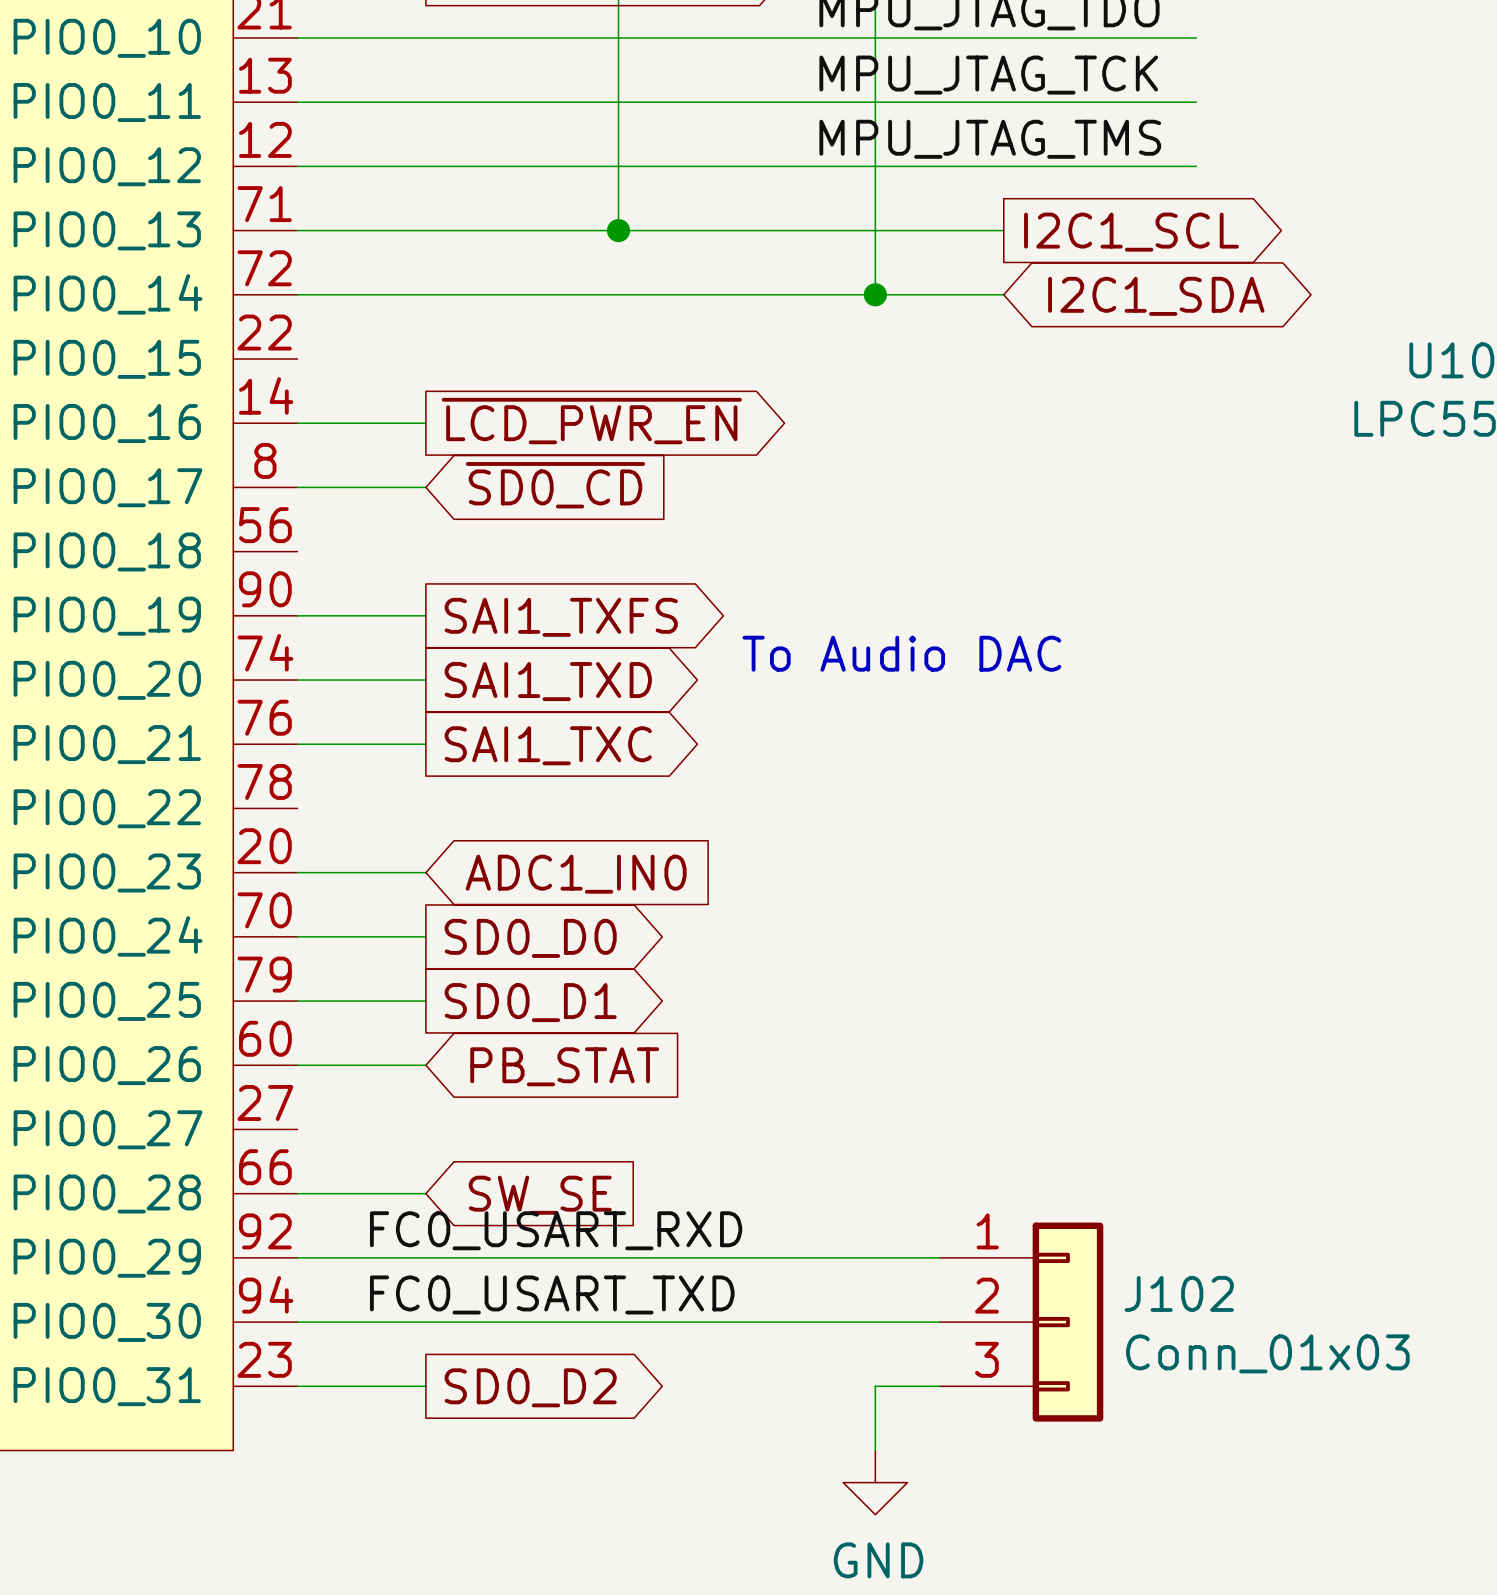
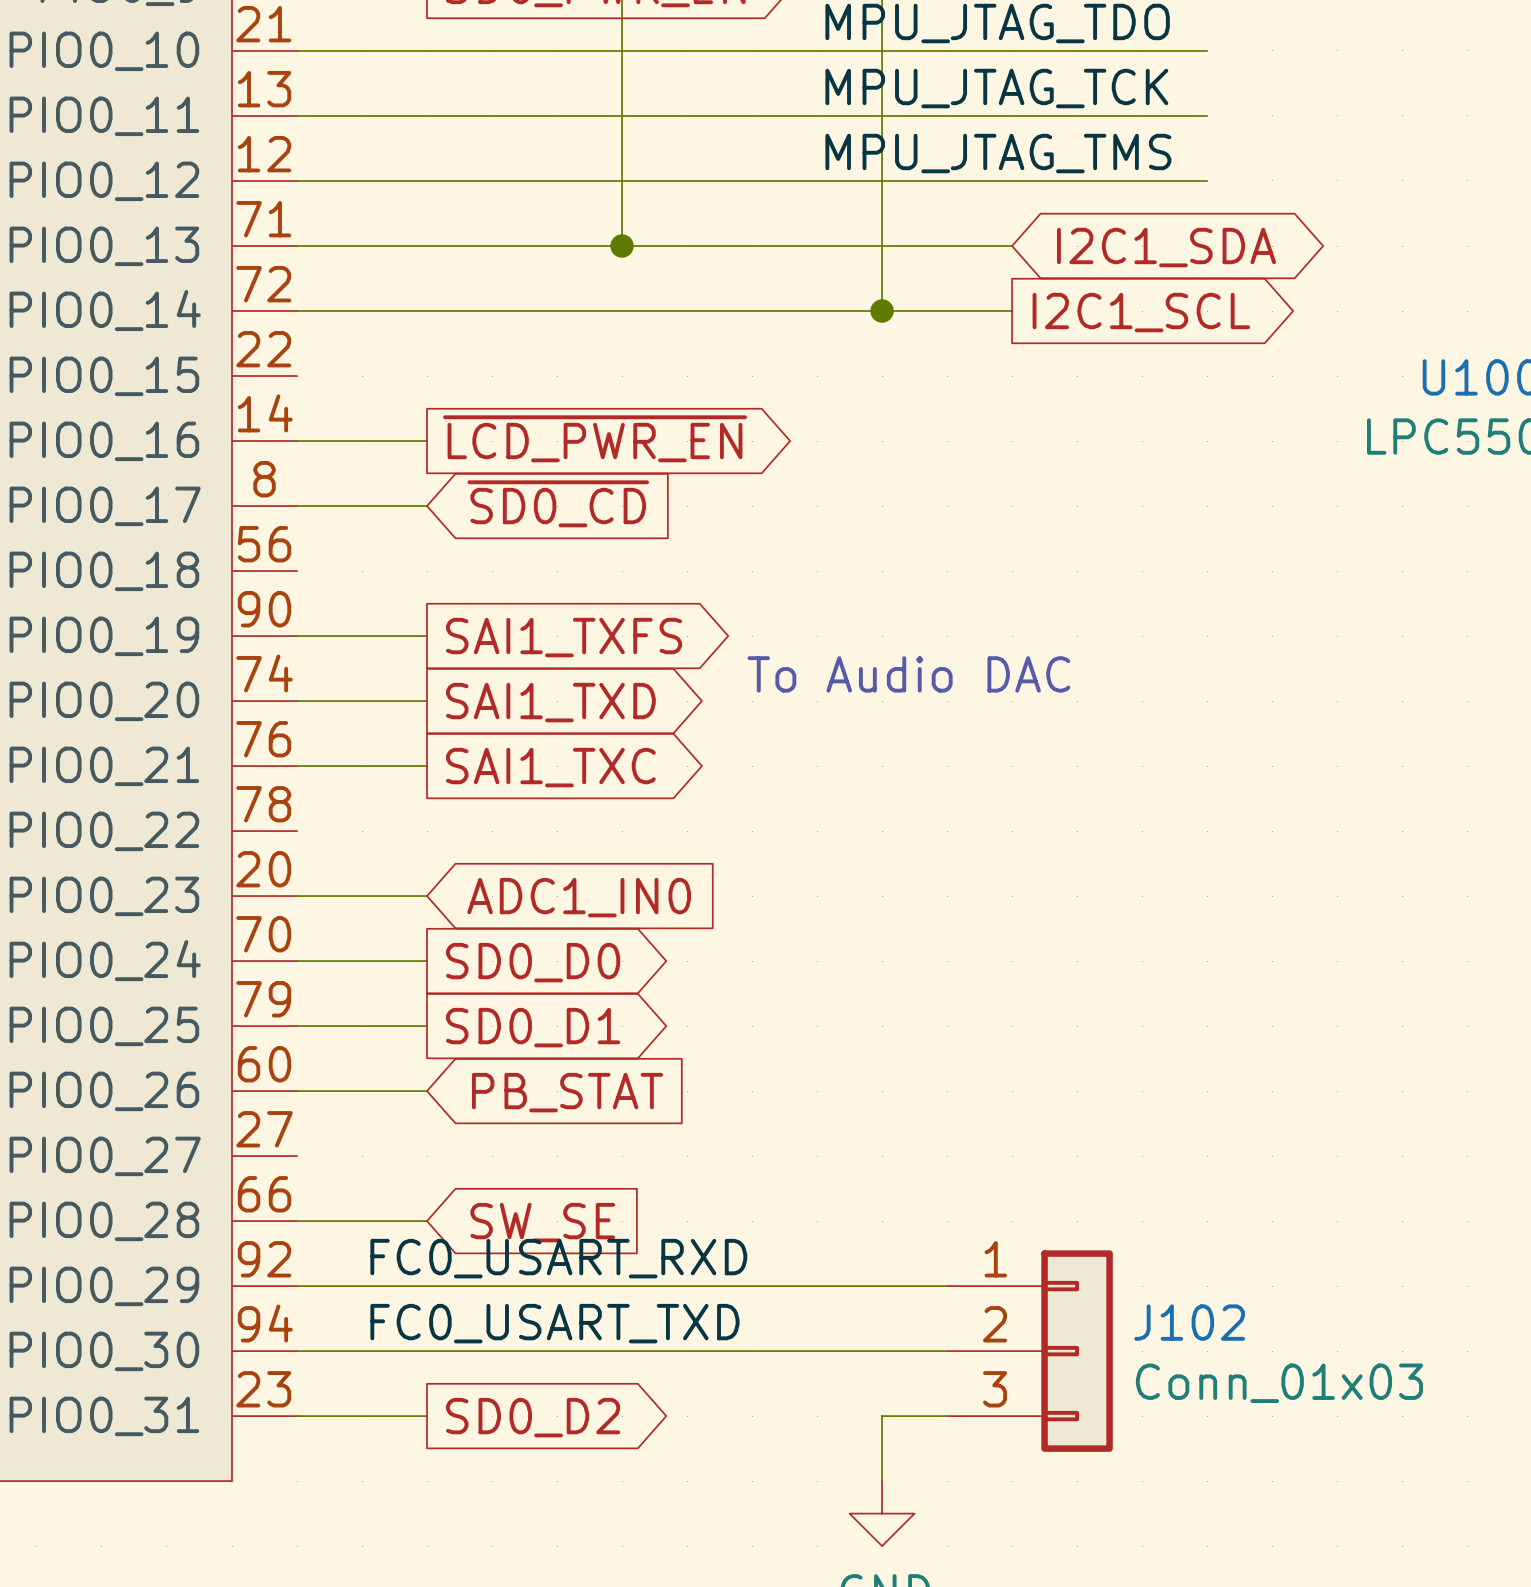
global label shape: output (1131, 232) -> bidirectional (1166, 247)
global label: I2C1_SCL (1131, 232) -> I2C1_SDA (1166, 247)
global label shape: bidirectional (1156, 296) -> output (1141, 312)
global label: I2C1_SDA (1156, 296) -> I2C1_SCL (1141, 312)

